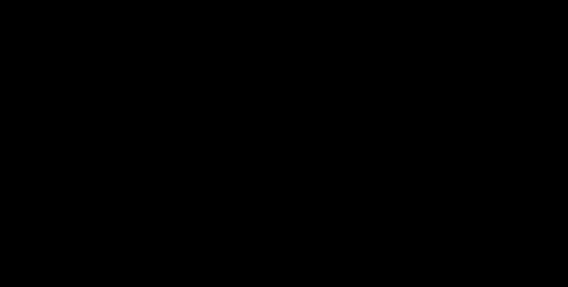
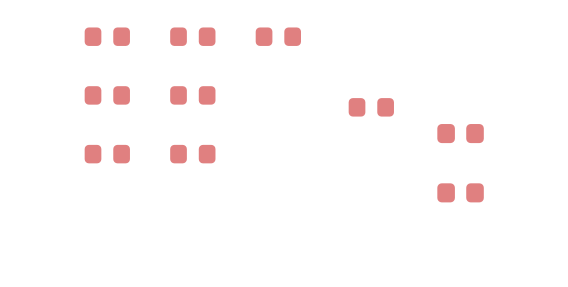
part: none -> (107, 36)
part: none -> (192, 36)
part: none -> (278, 36)
part: none -> (107, 95)
part: none -> (192, 95)
part: none -> (371, 107)
part: none -> (460, 133)
part: none -> (107, 154)
part: none -> (192, 154)
part: none -> (460, 192)

